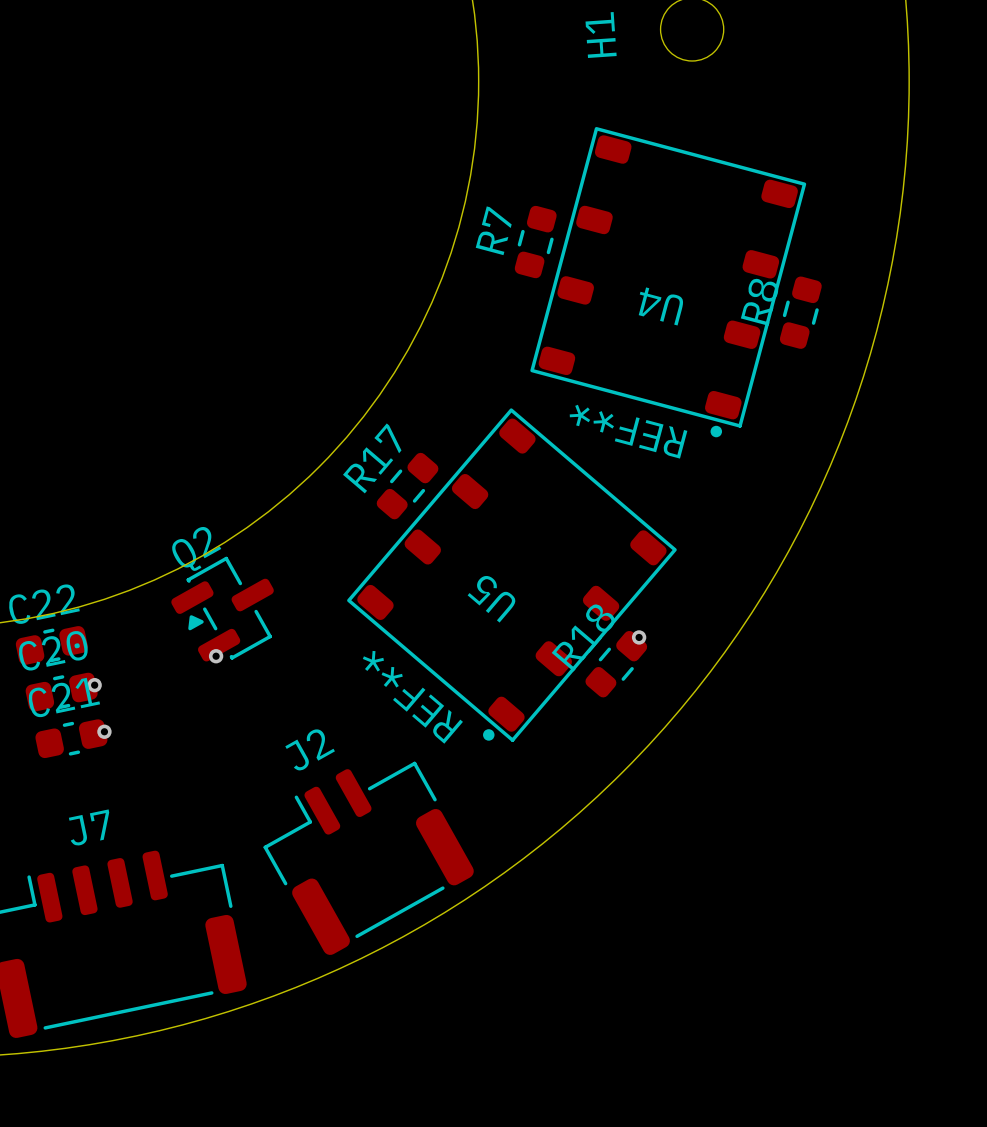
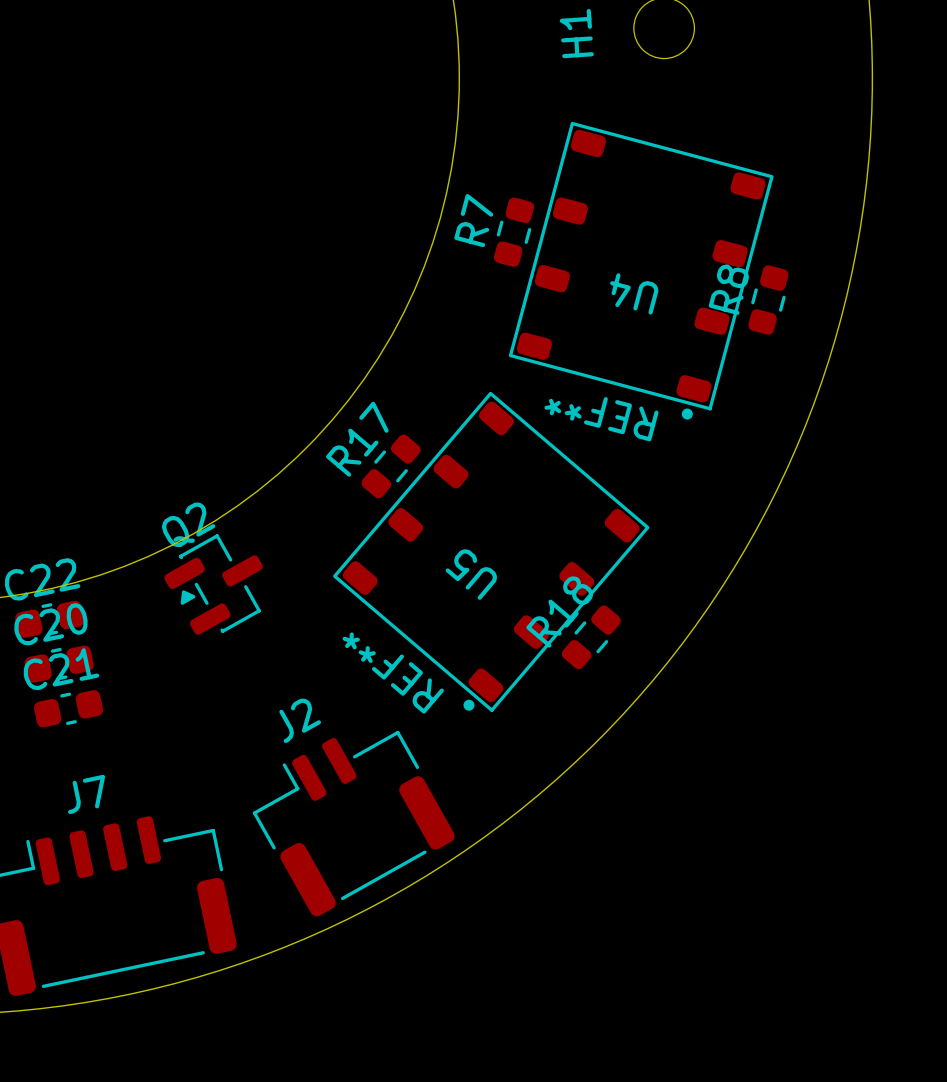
via: (639, 637) -> none
via: (216, 656) -> none
via: (94, 685) -> none
via: (104, 731) -> none

